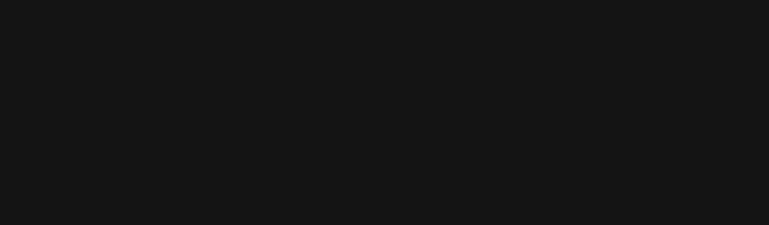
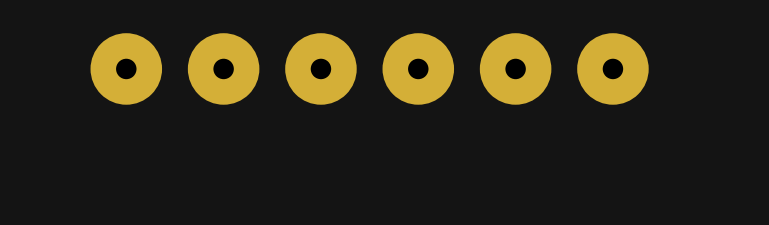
part: none -> (126, 68)
part: none -> (223, 68)
part: none -> (320, 68)
part: none -> (418, 68)
part: none -> (515, 68)
part: none -> (612, 68)

